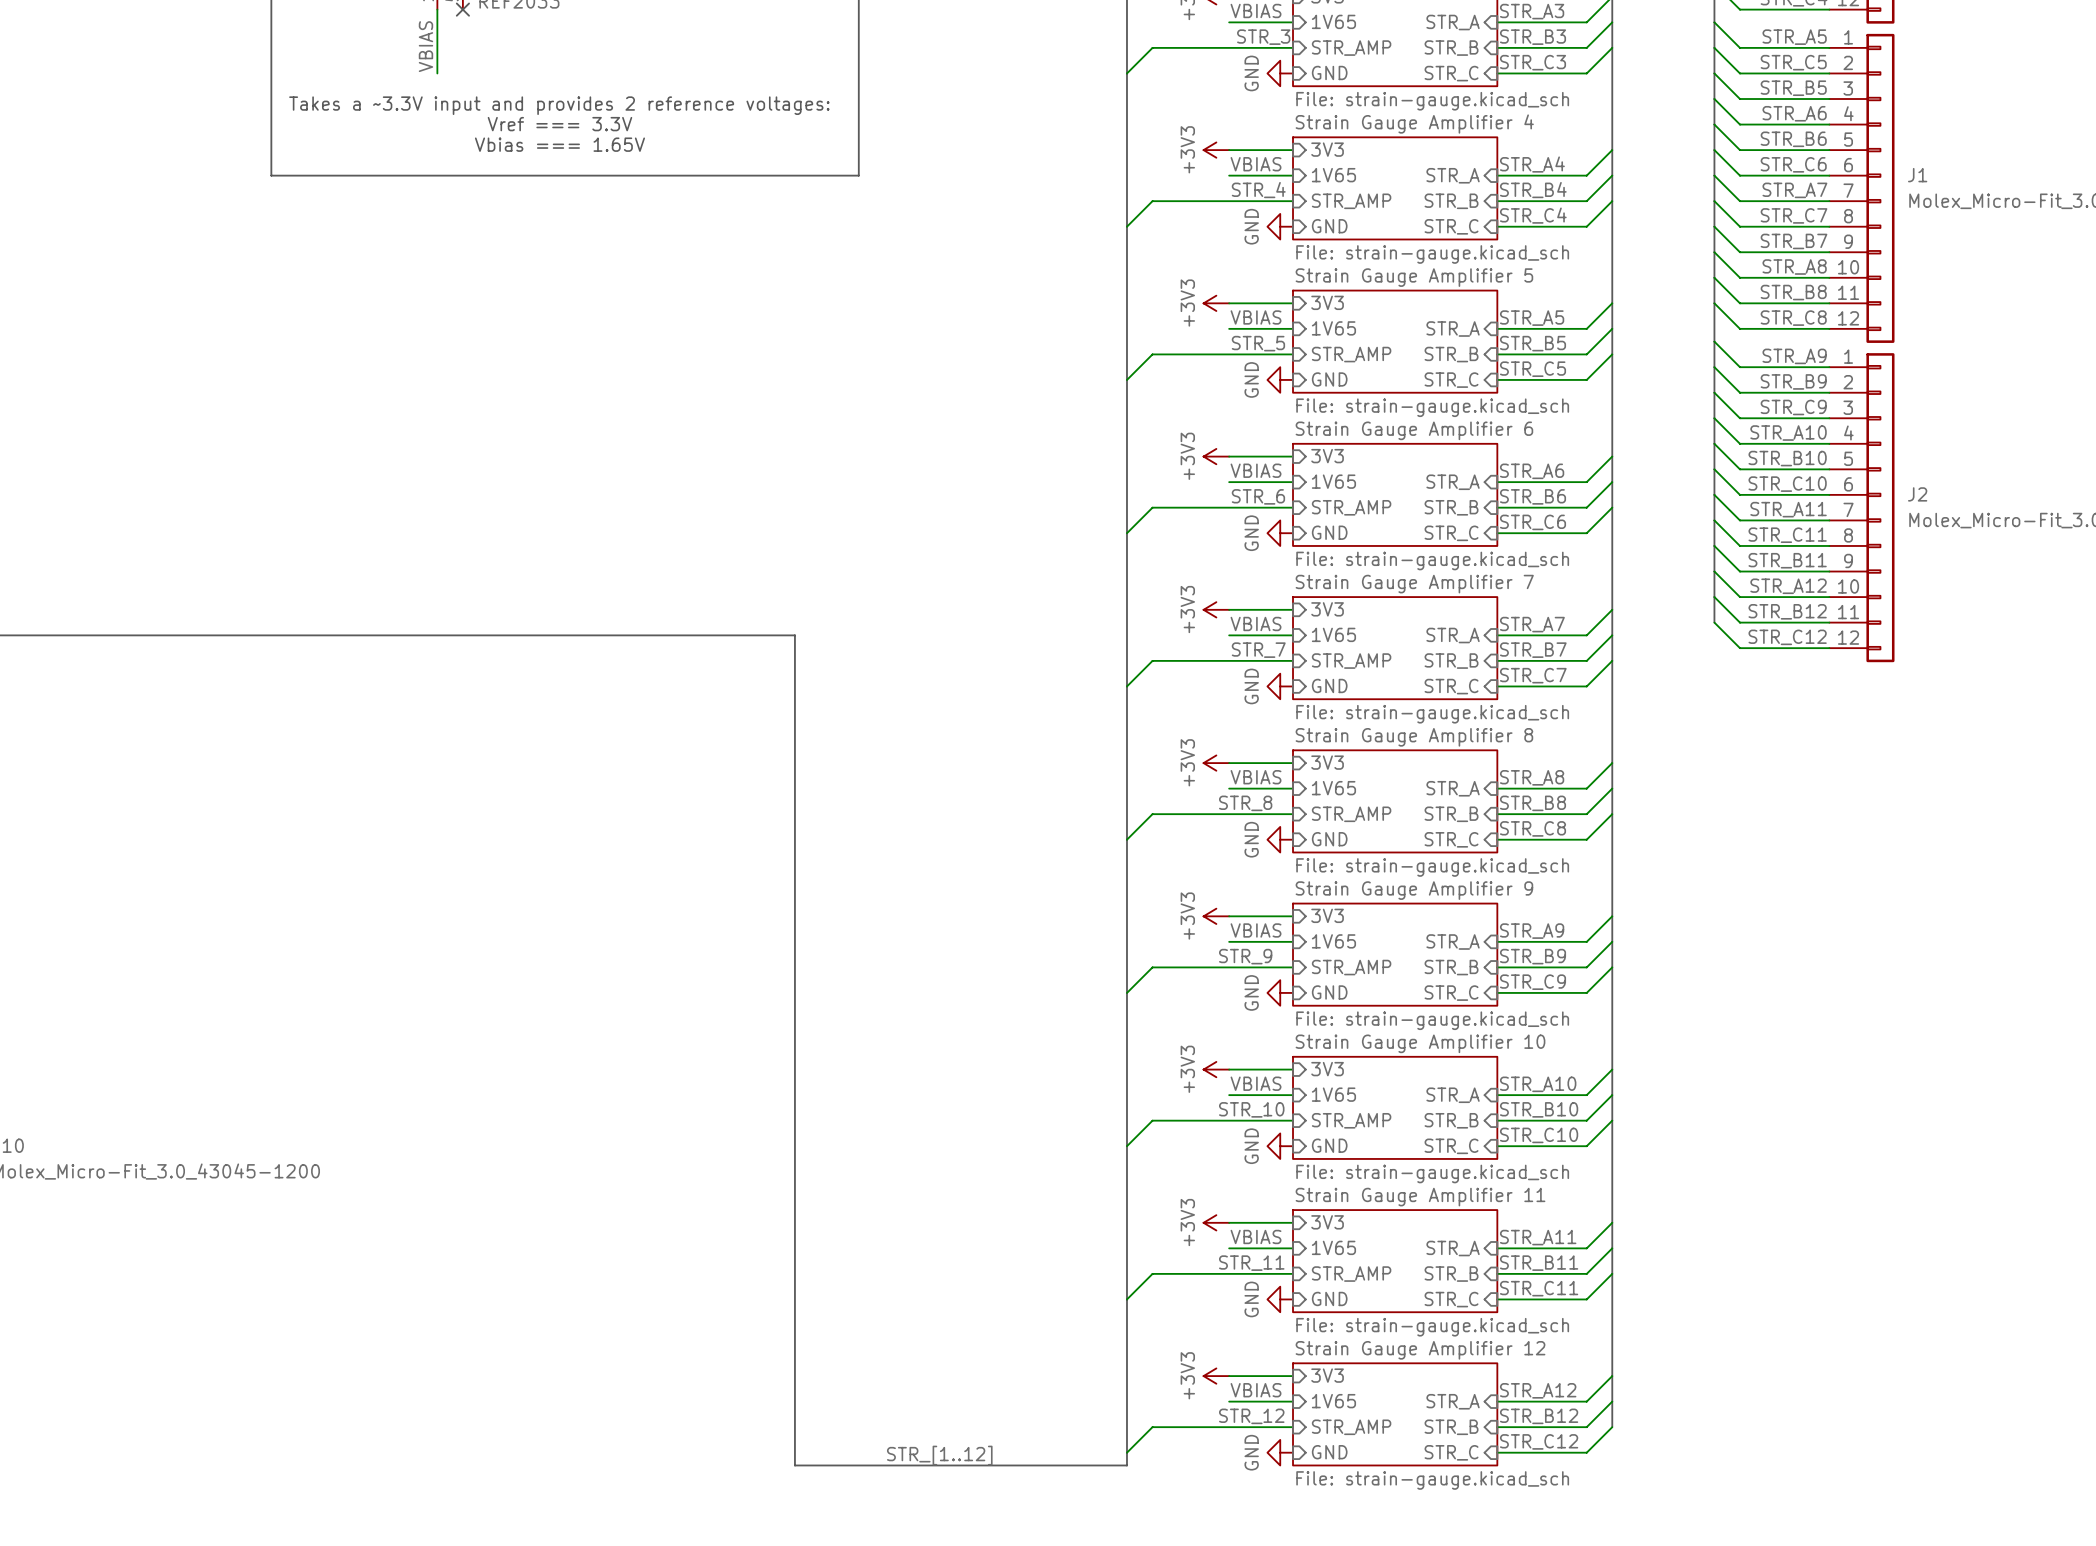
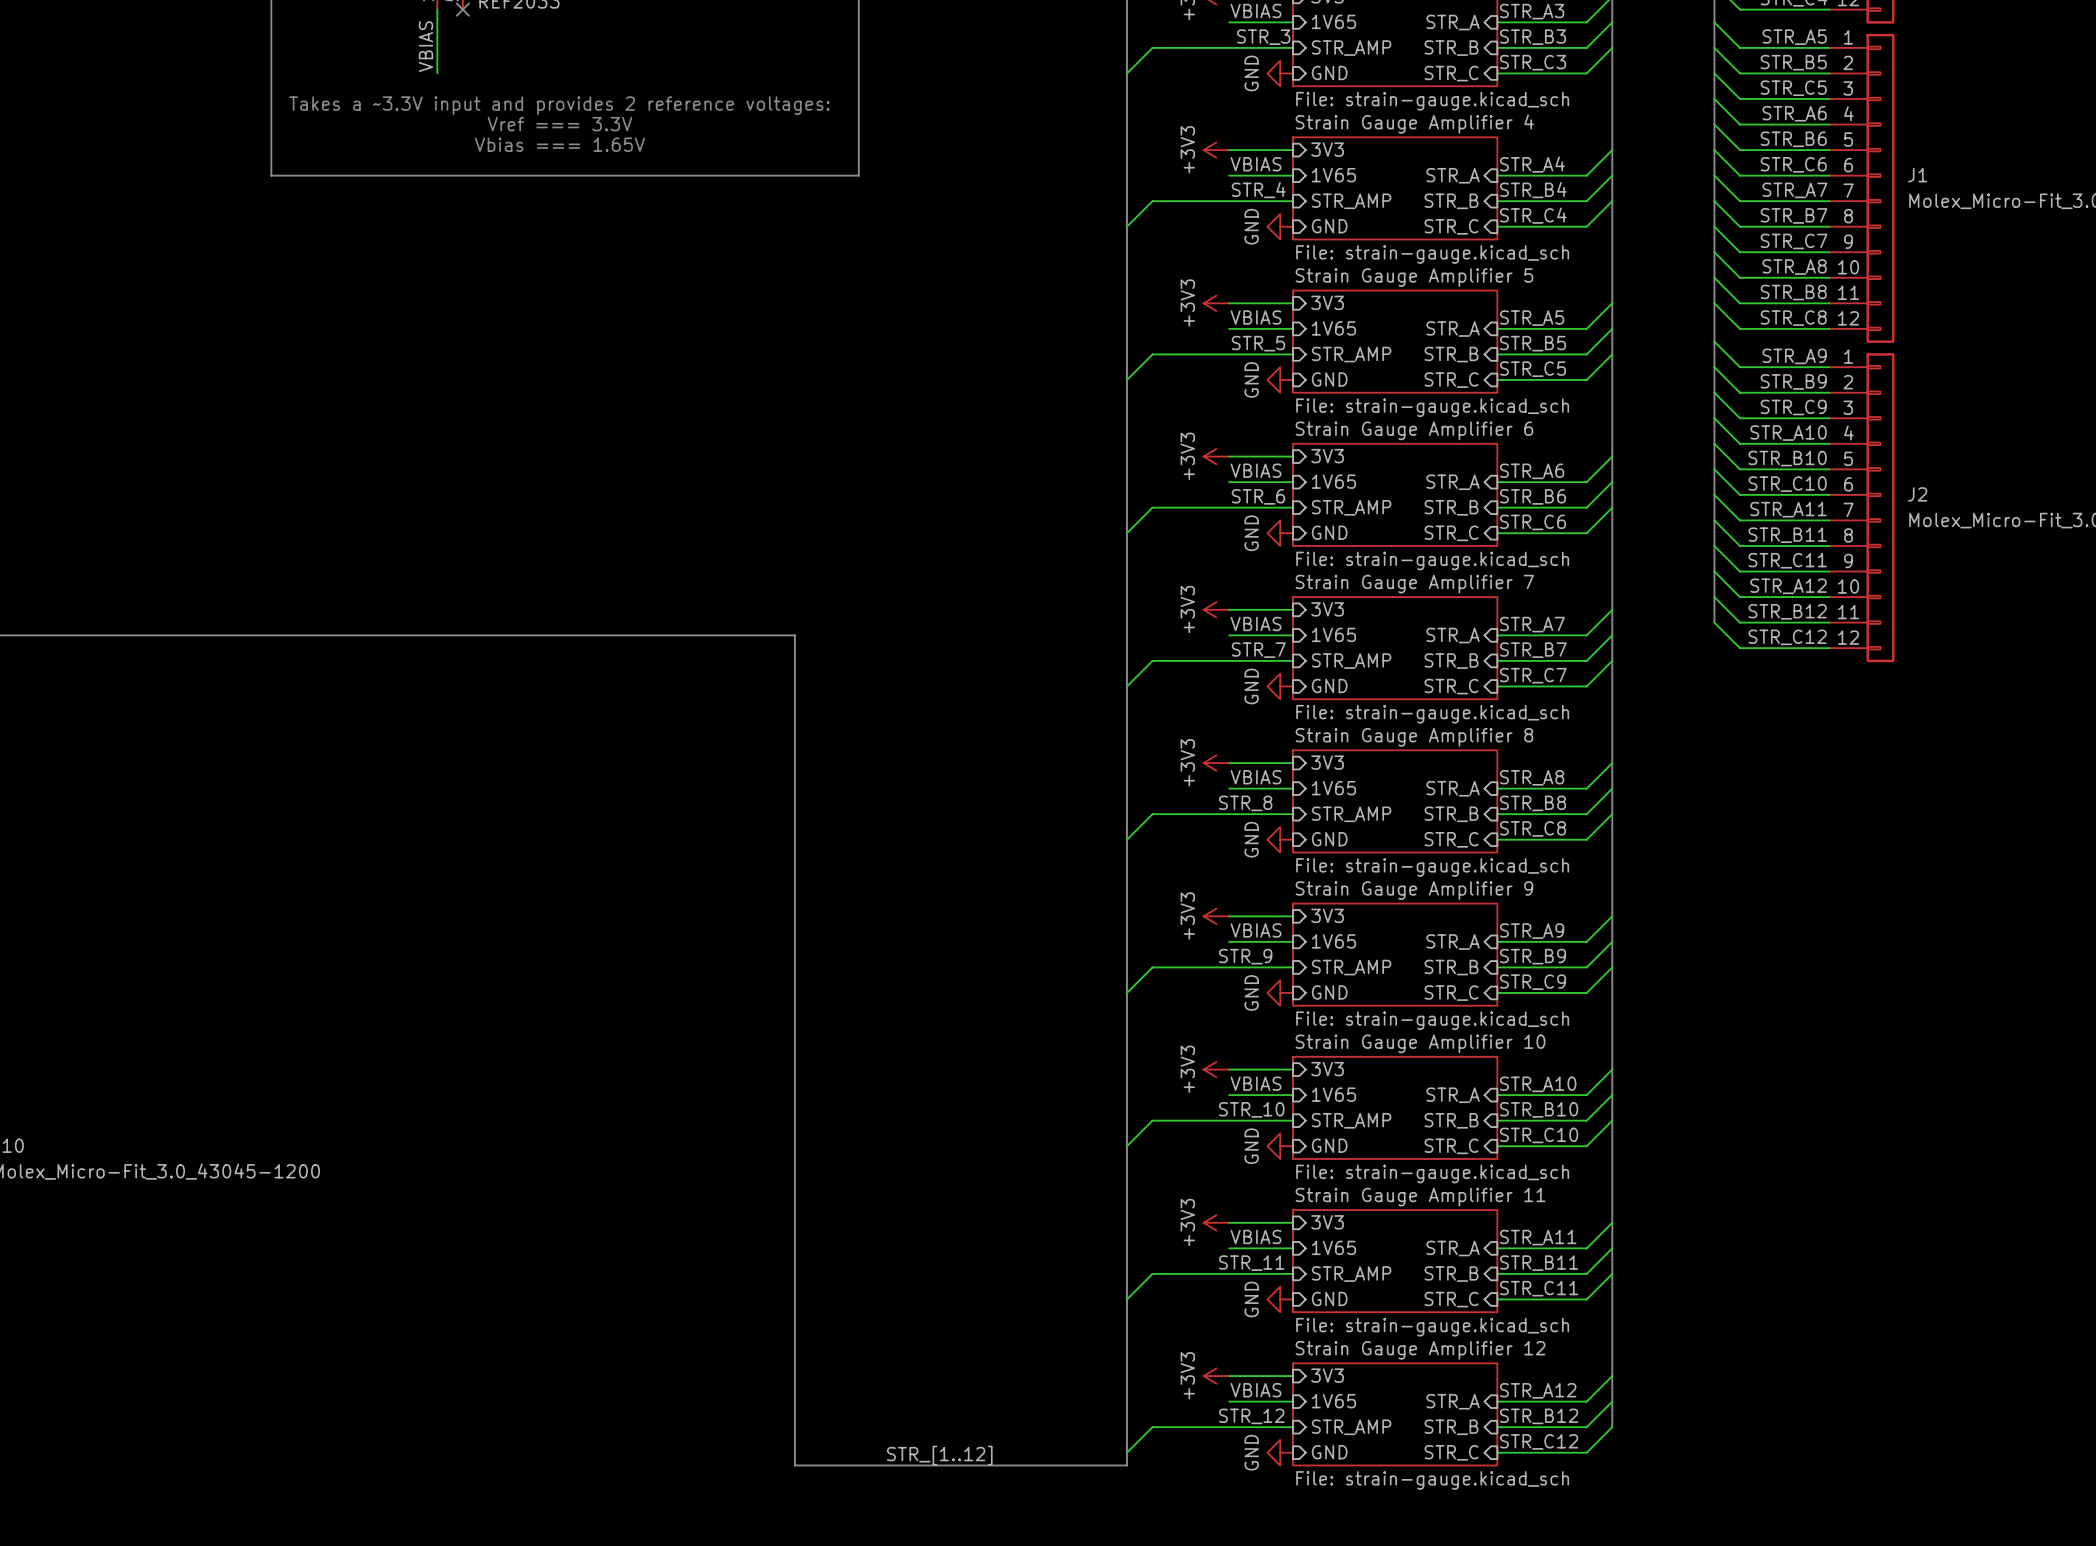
label: STR_C5 (1793, 62) -> STR_B5 (1793, 62)
label: STR_B5 (1793, 88) -> STR_C5 (1793, 88)
label: STR_C7 (1794, 215) -> STR_B7 (1794, 215)
label: STR_B7 (1794, 241) -> STR_C7 (1794, 241)
label: STR_C11 (1787, 535) -> STR_B11 (1787, 535)
label: STR_B11 (1787, 560) -> STR_C11 (1787, 560)

